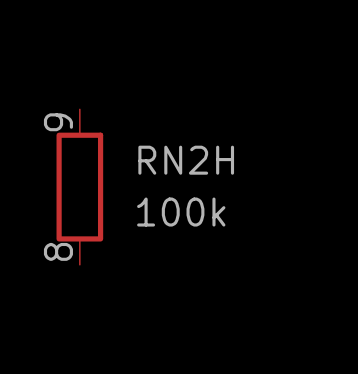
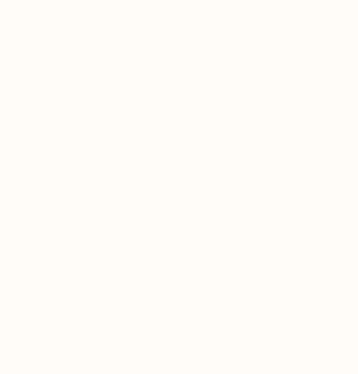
RN2H: 100k (79, 187) -> none

